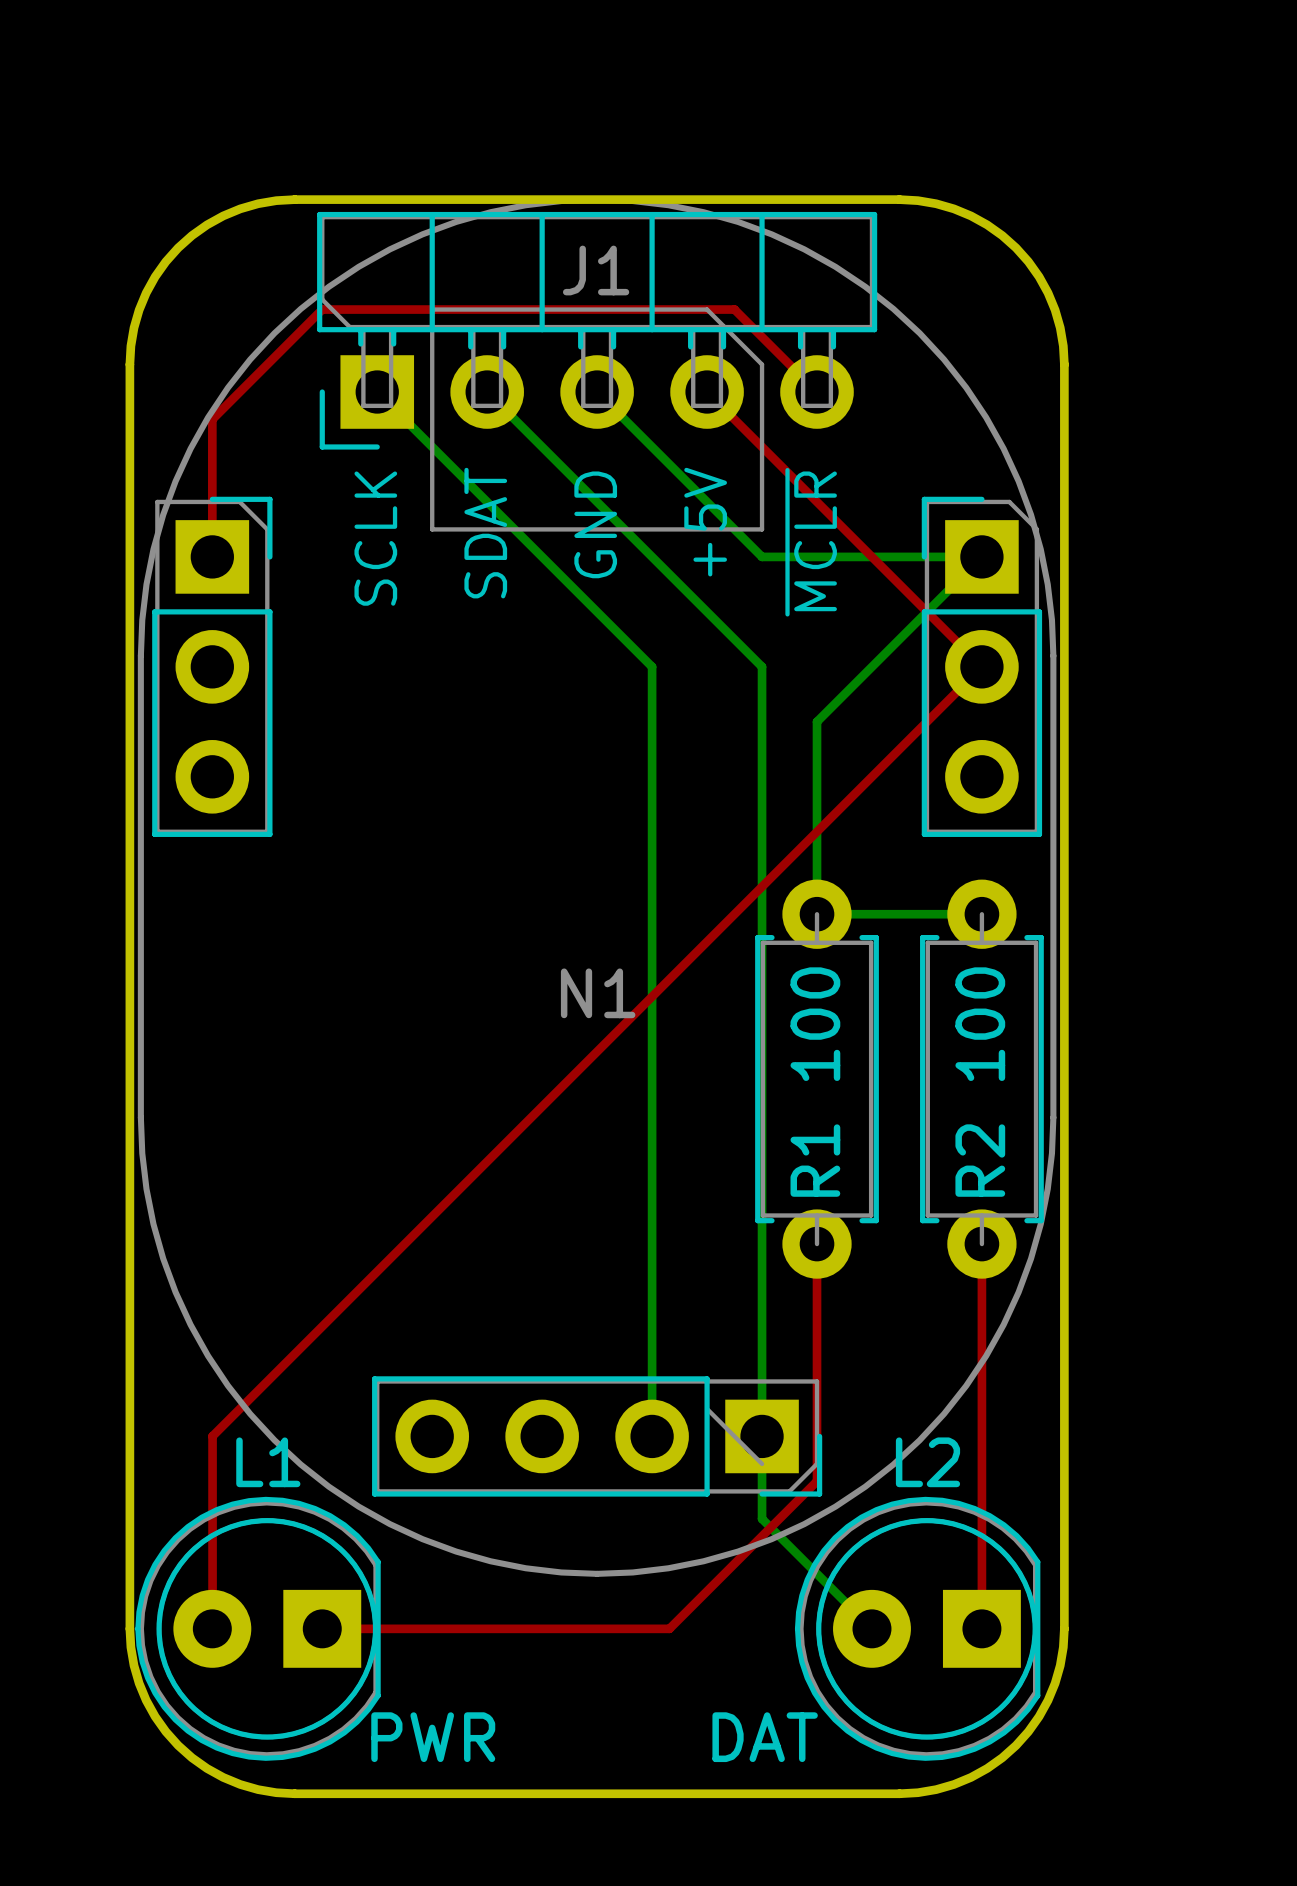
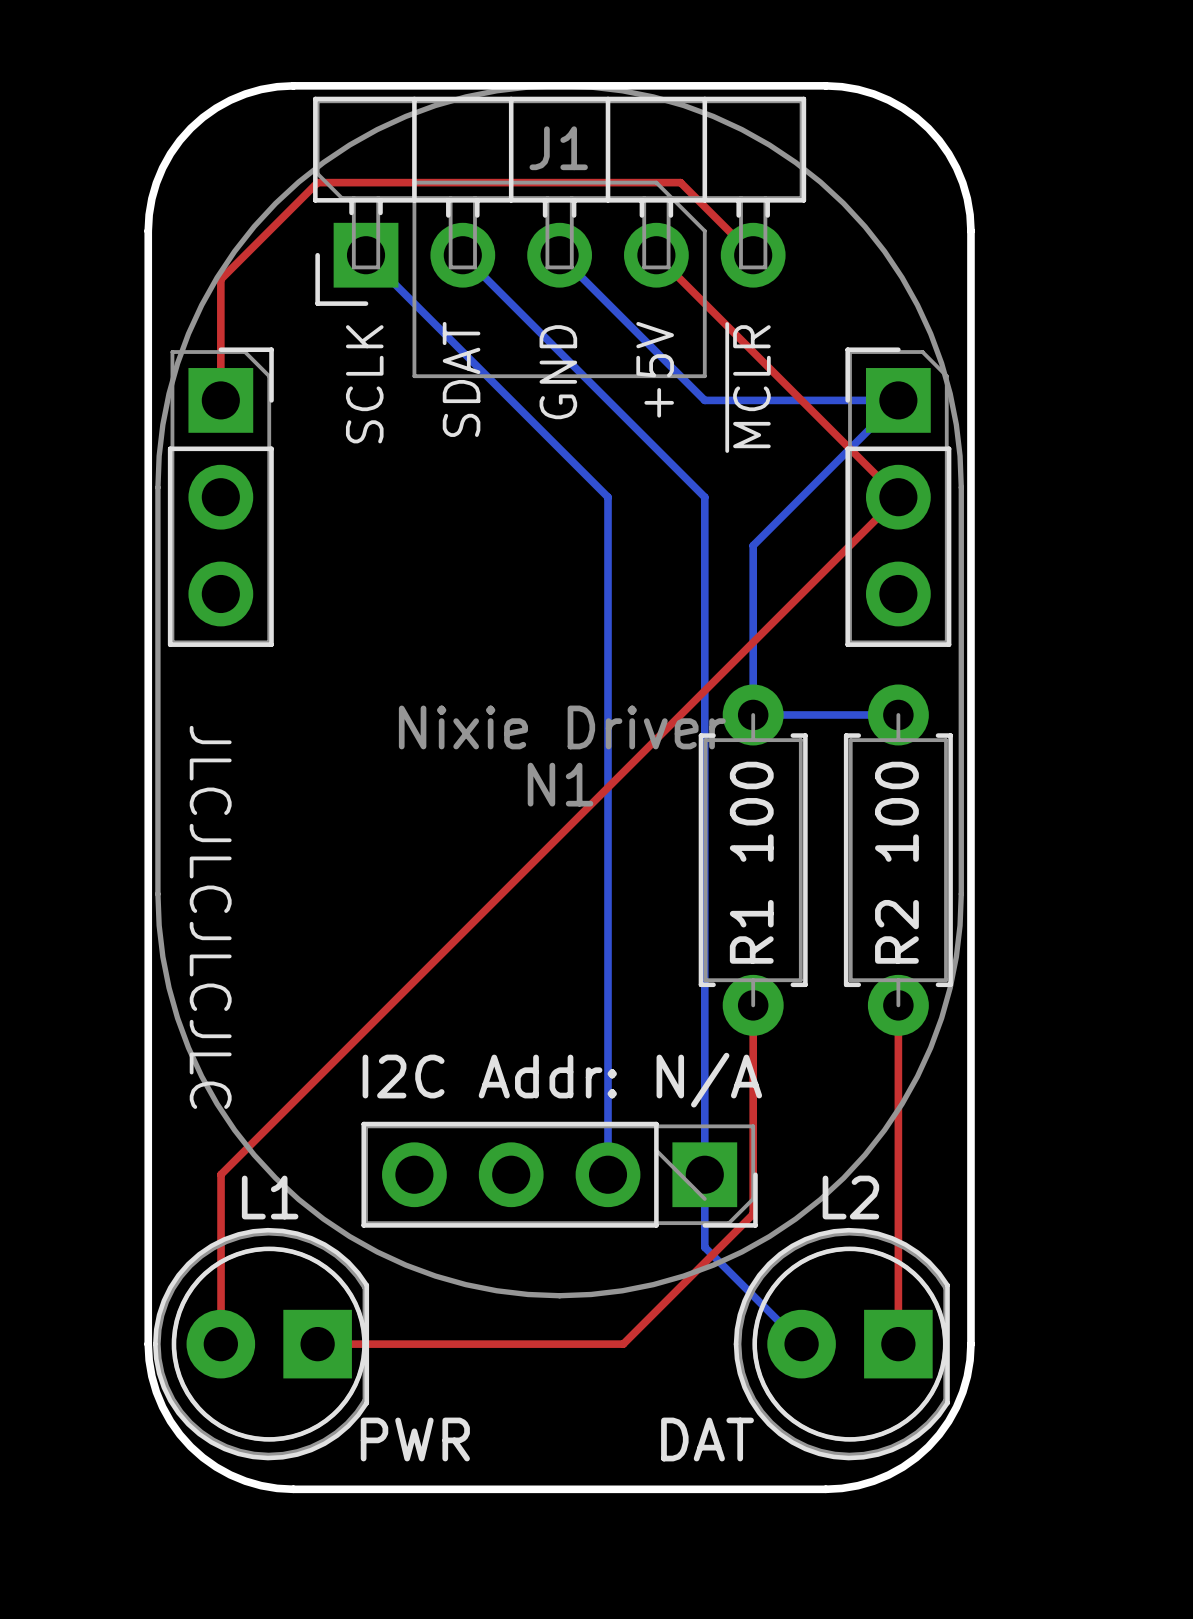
N1 value: none -> Nixie Driver (562, 727)
text: none -> JLCJLCJLCJLC (210, 917)
N1 text: none -> I2C Addr: N/A (562, 1080)

